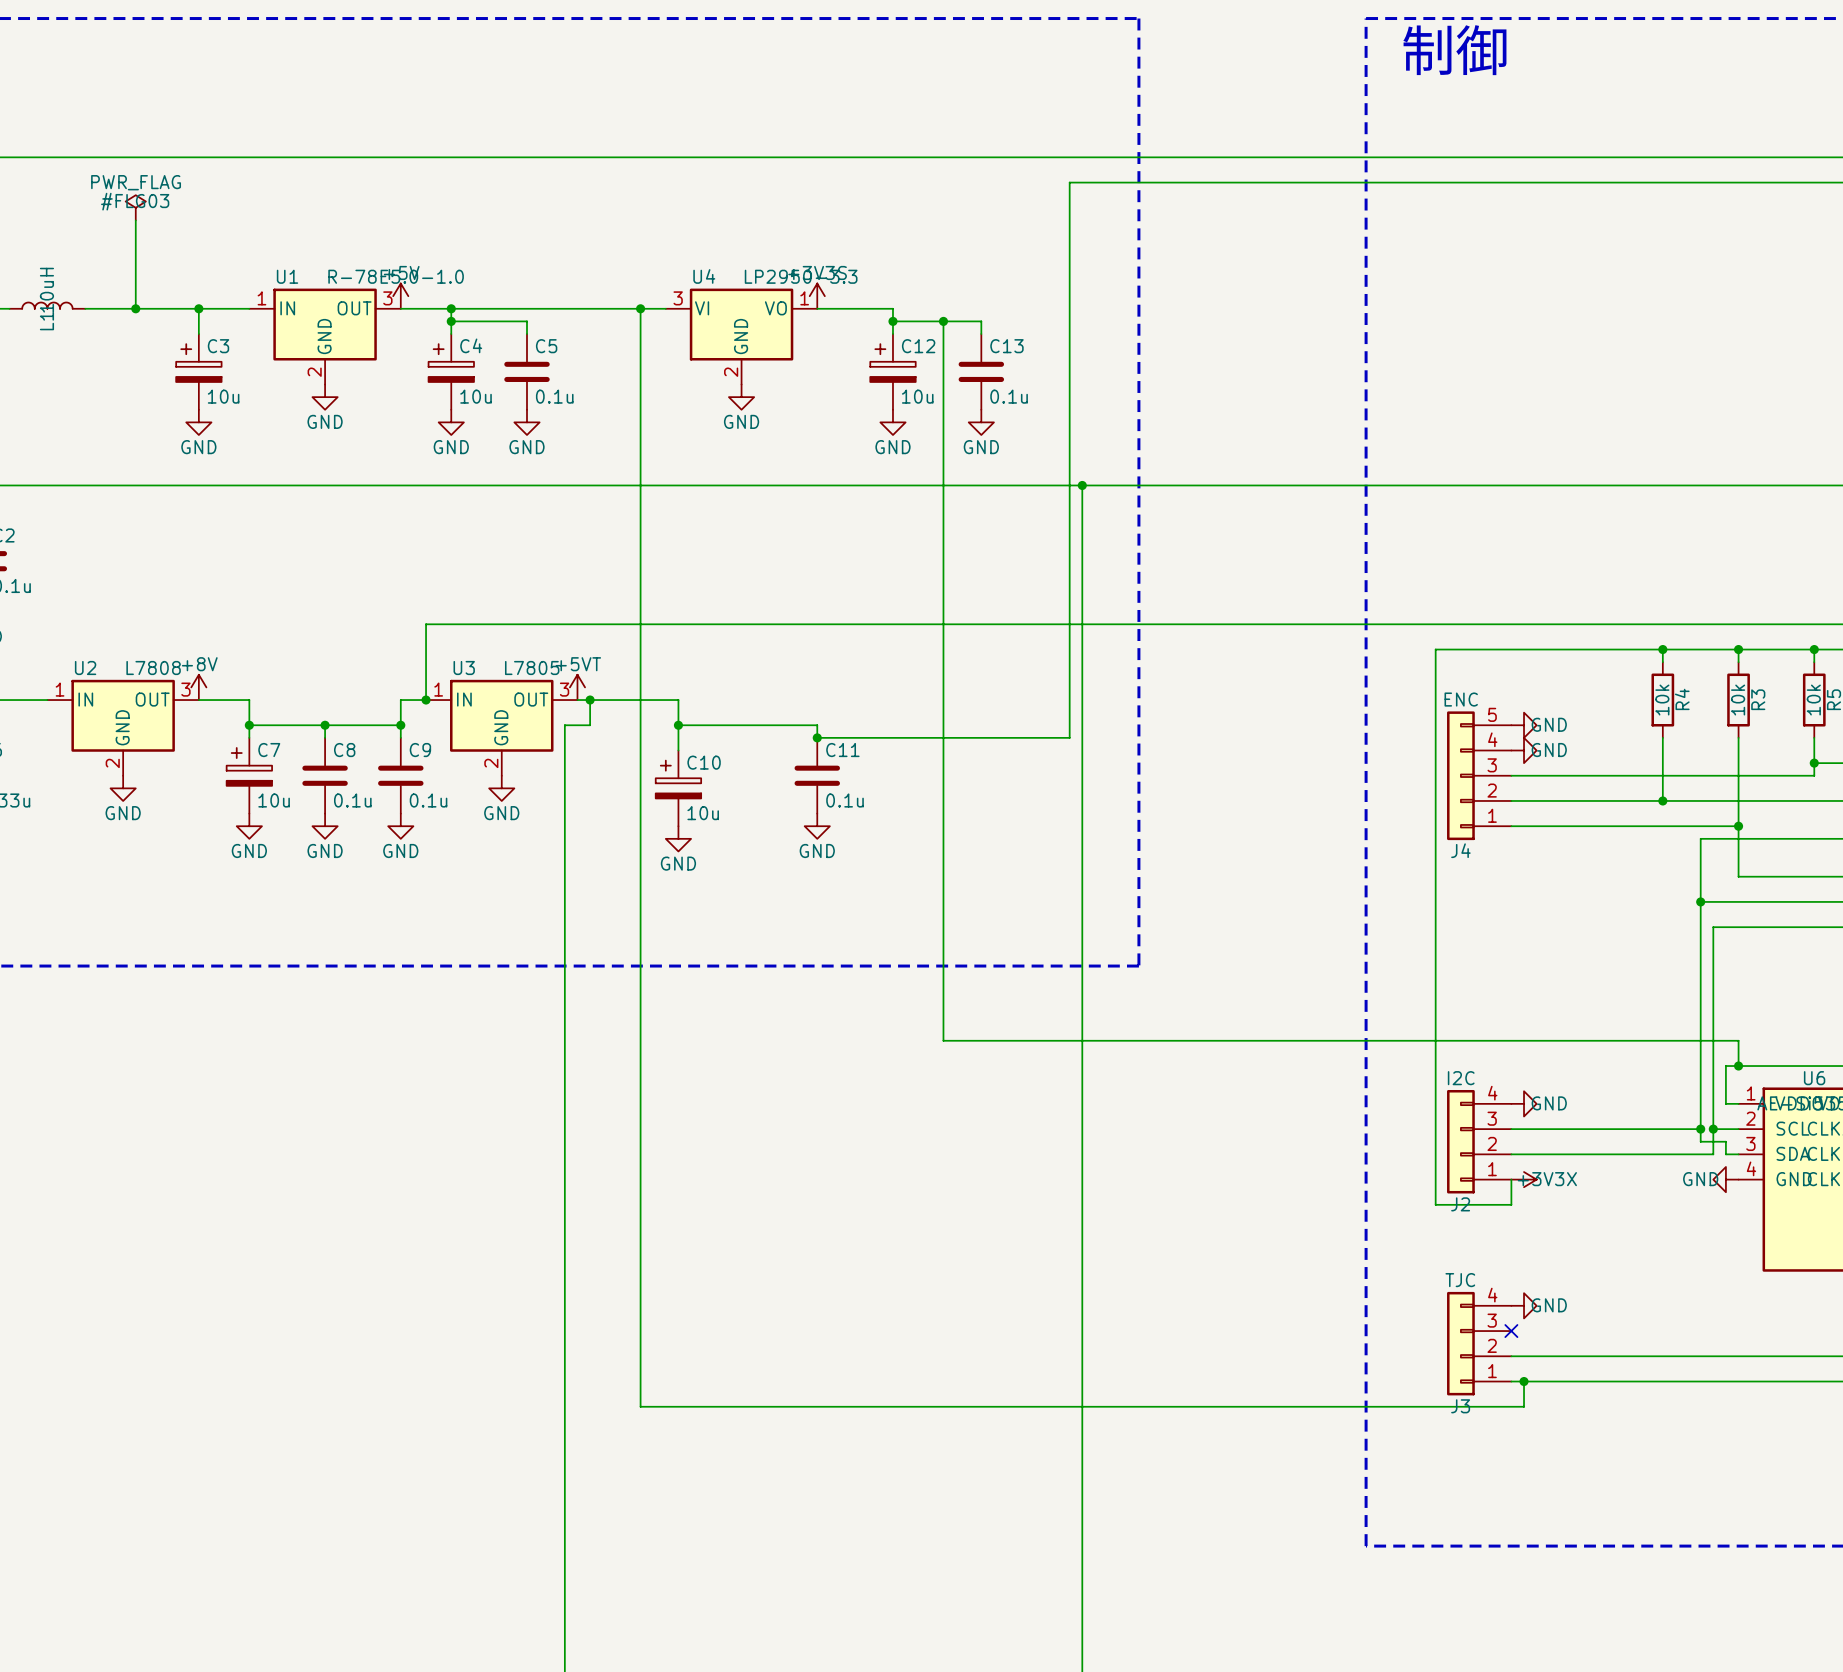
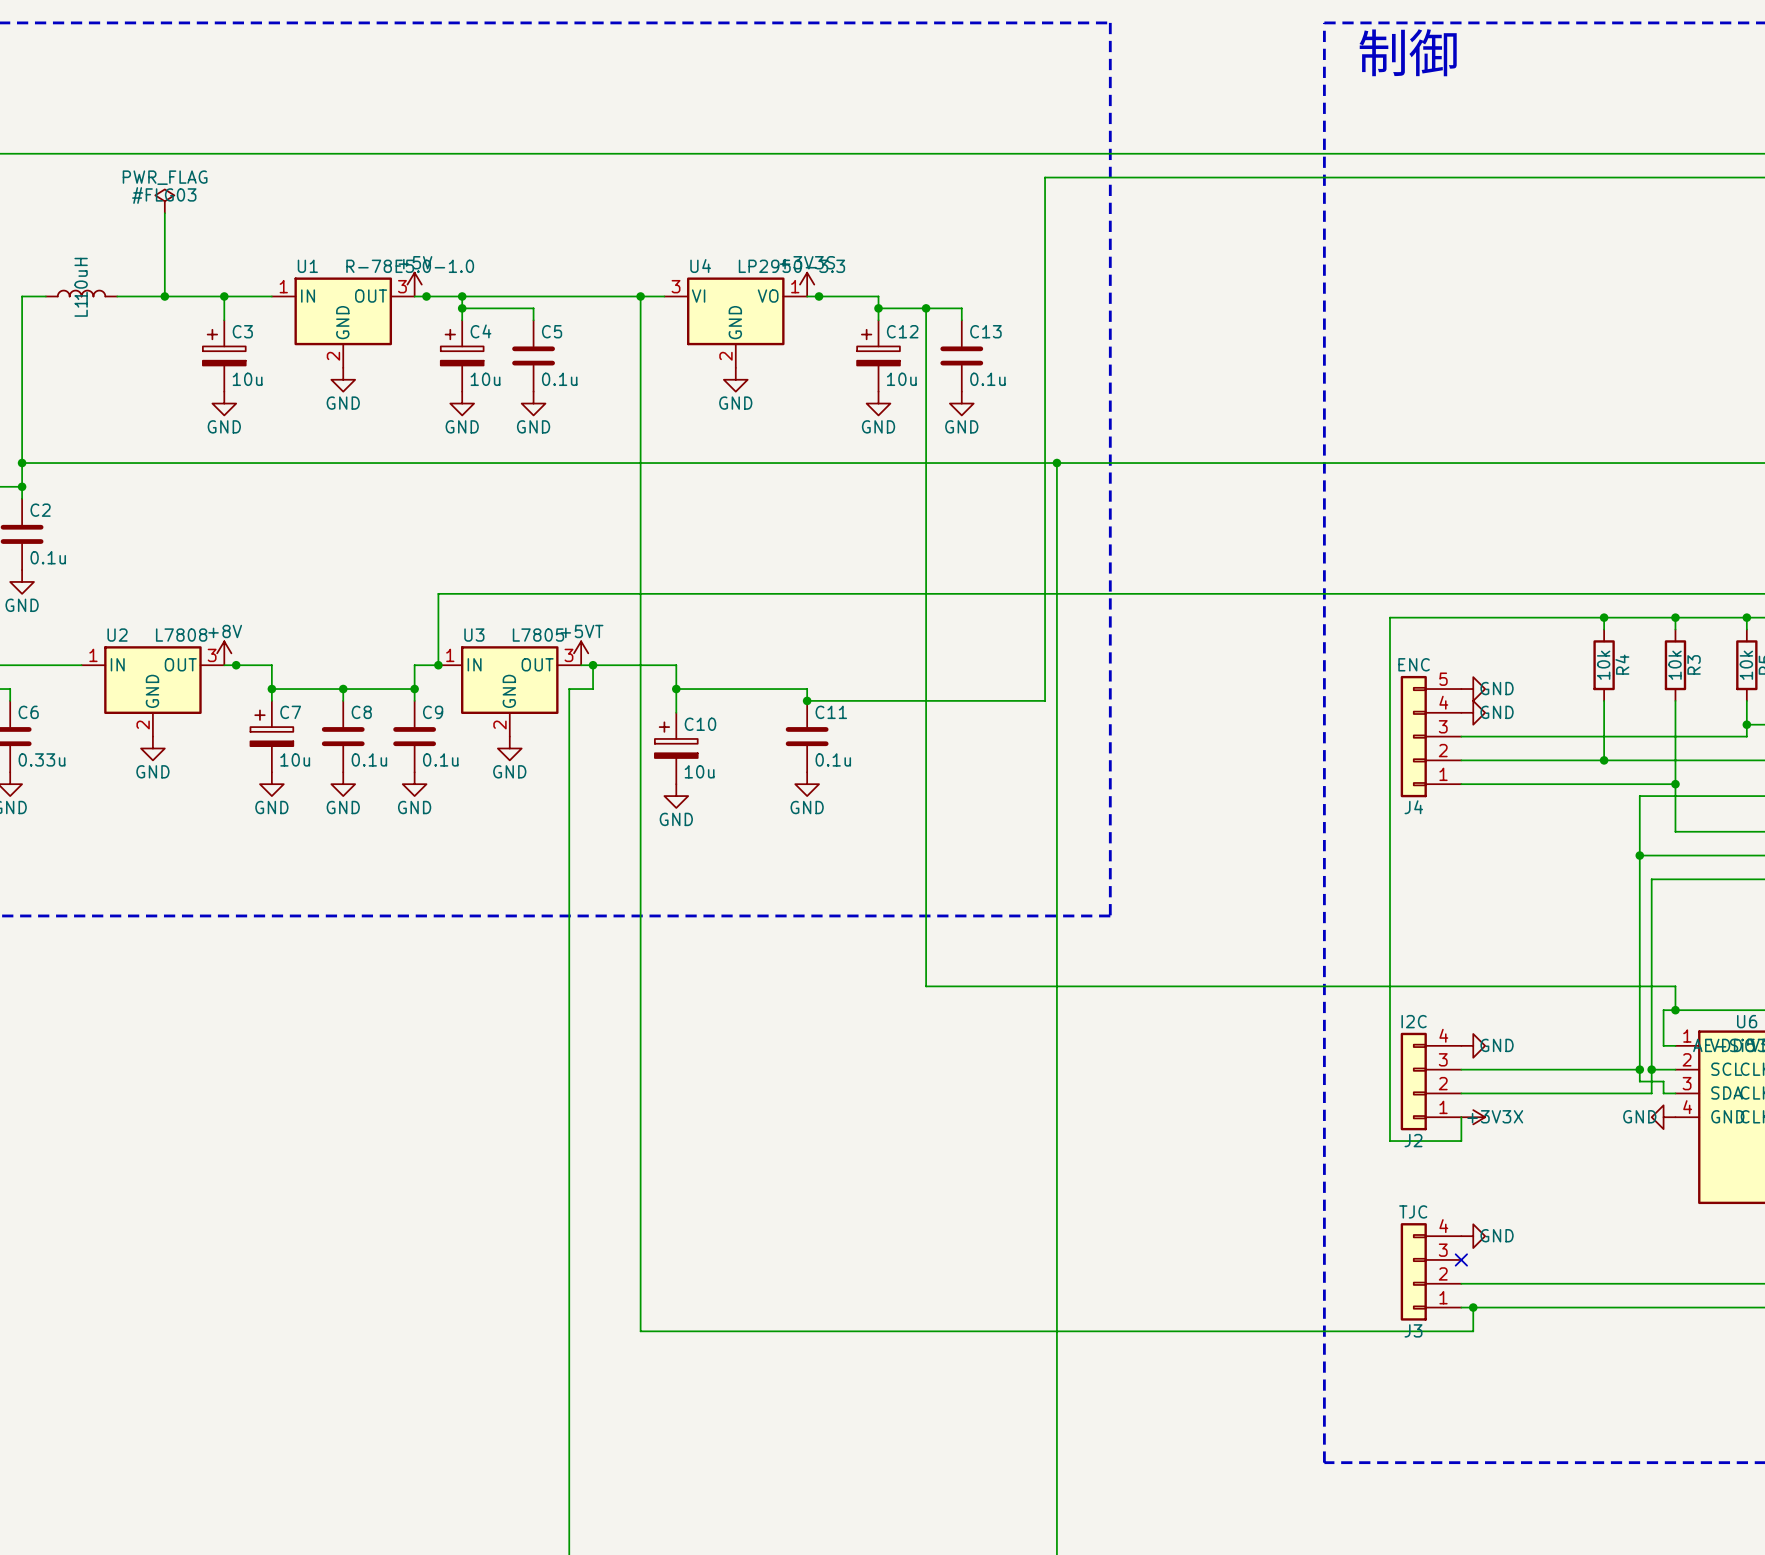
junction: none -> (426, 296)
junction: none -> (819, 296)
junction: none -> (236, 665)

